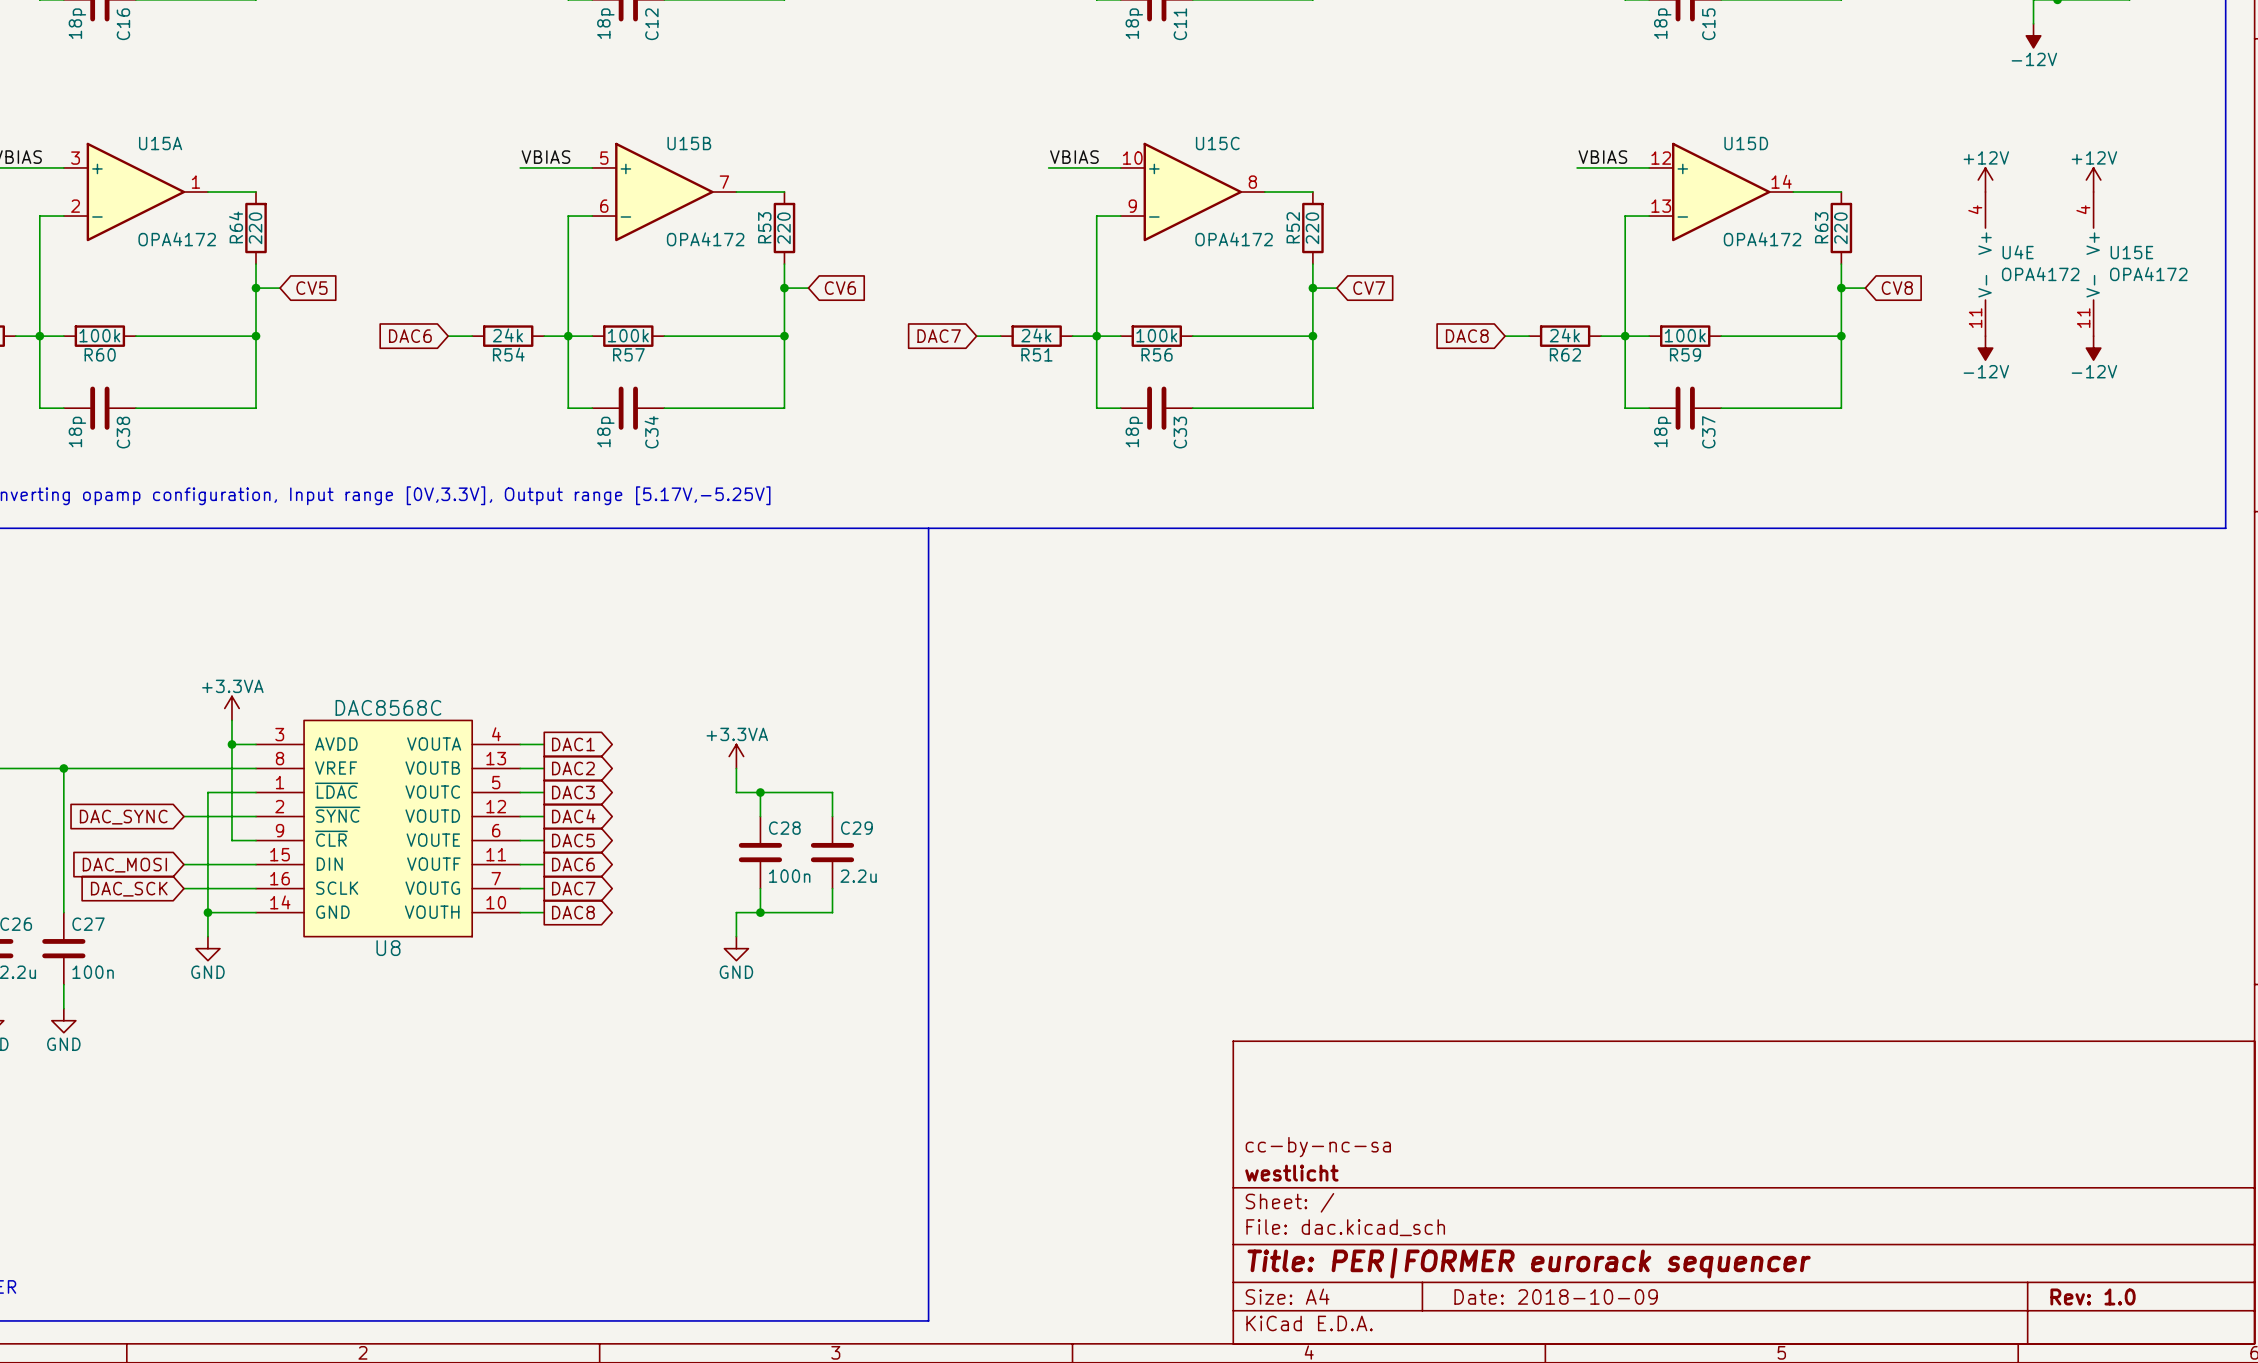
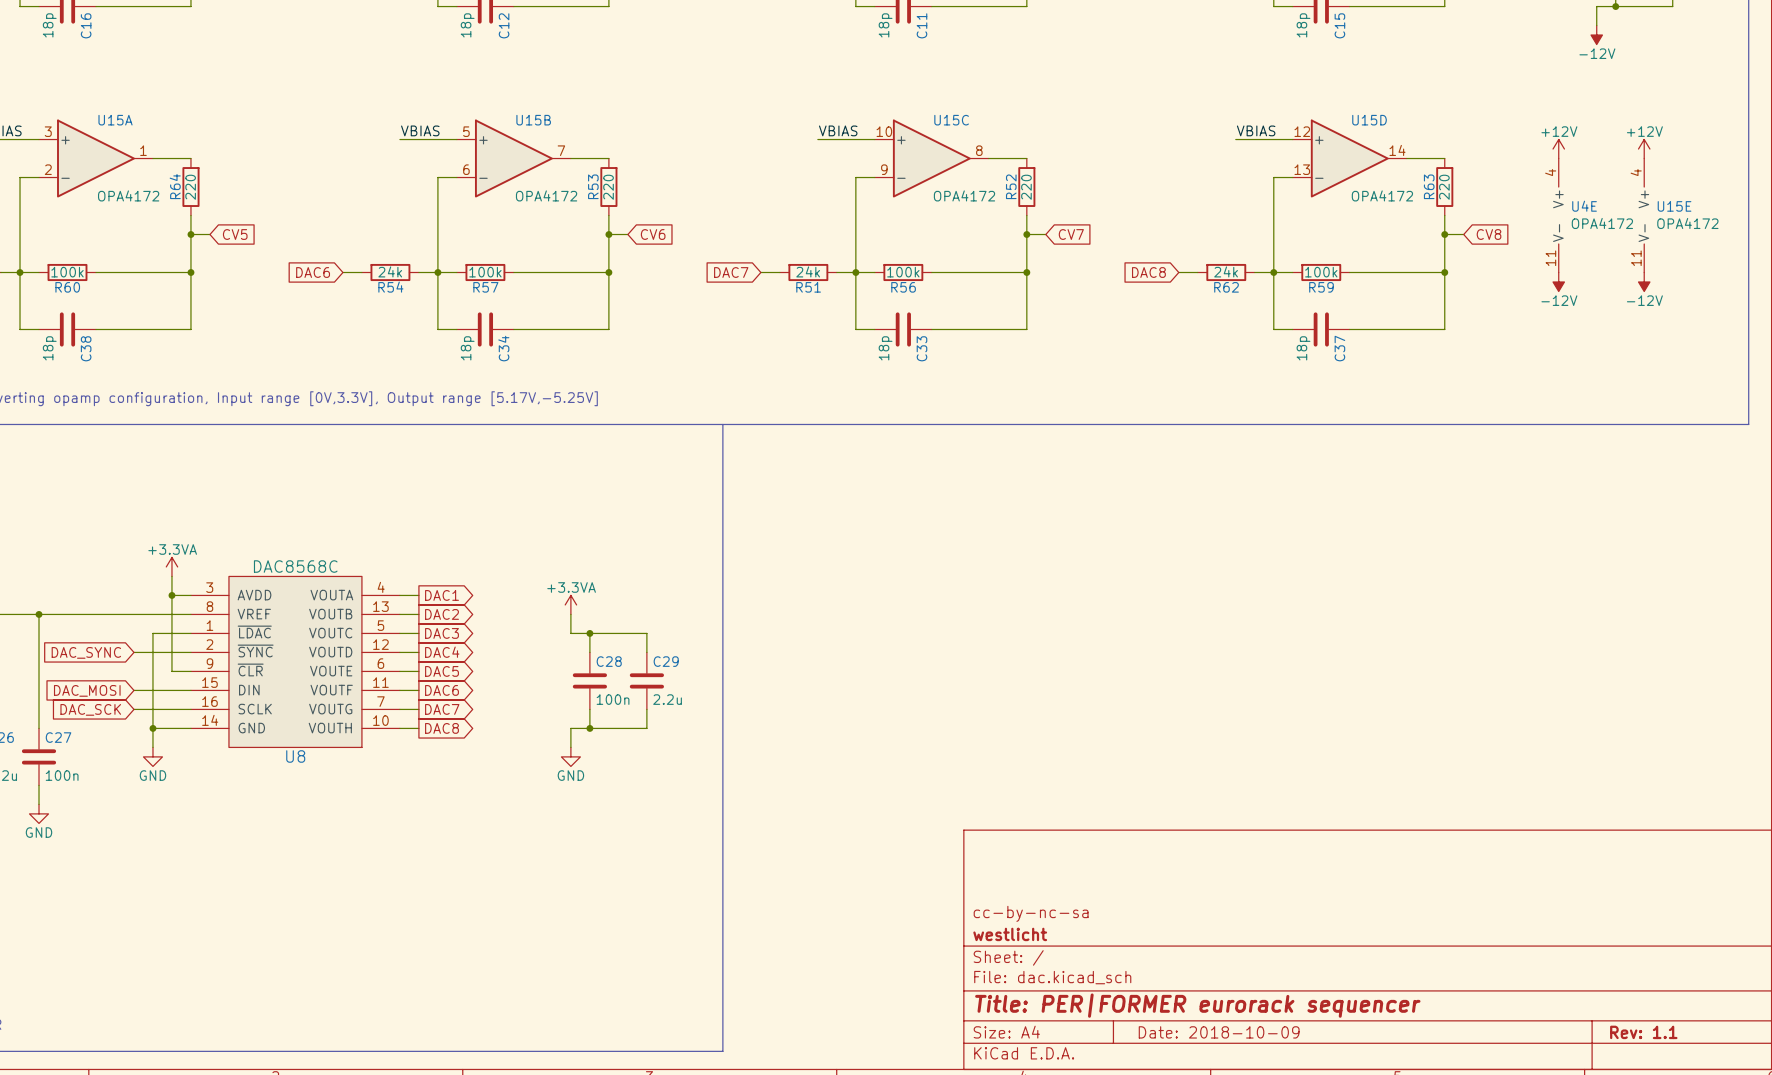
title block: Rev: 1.0 (2093, 1296) -> Rev: 1.1 (1643, 1032)

